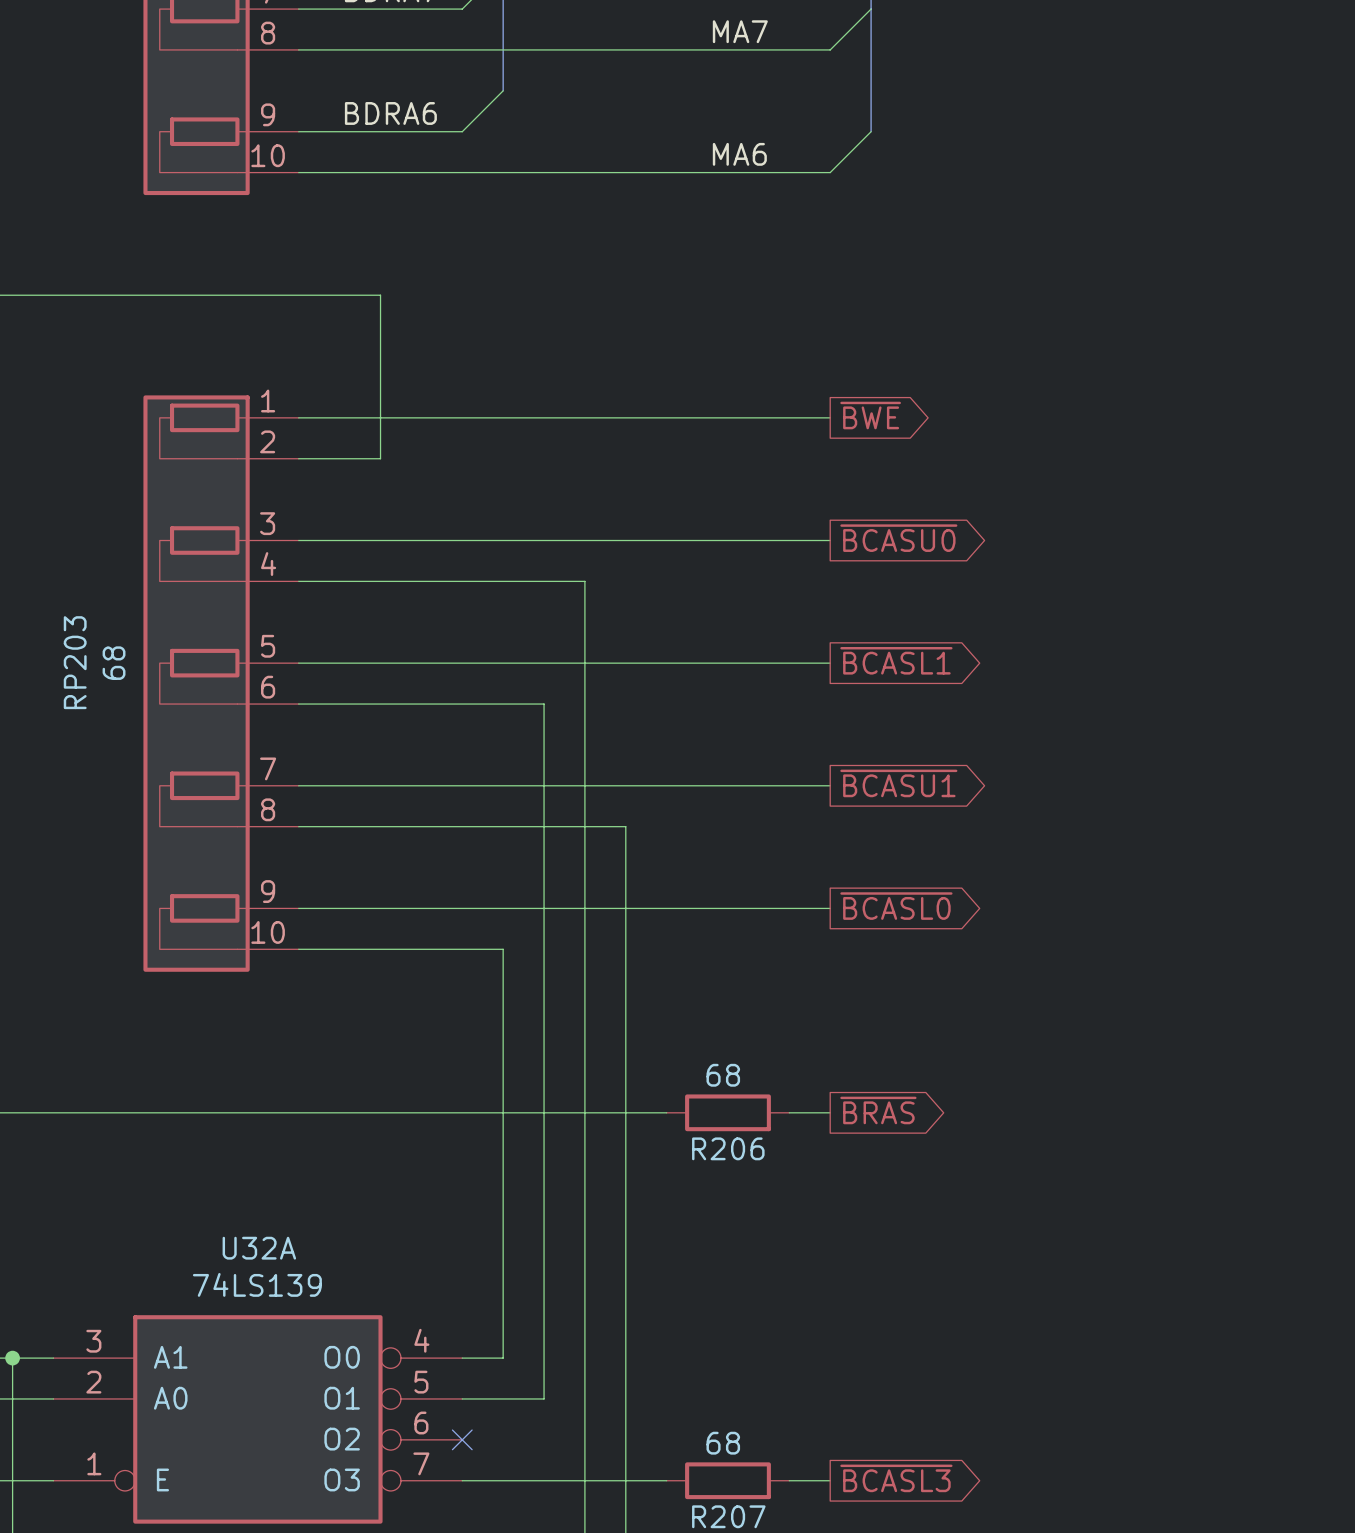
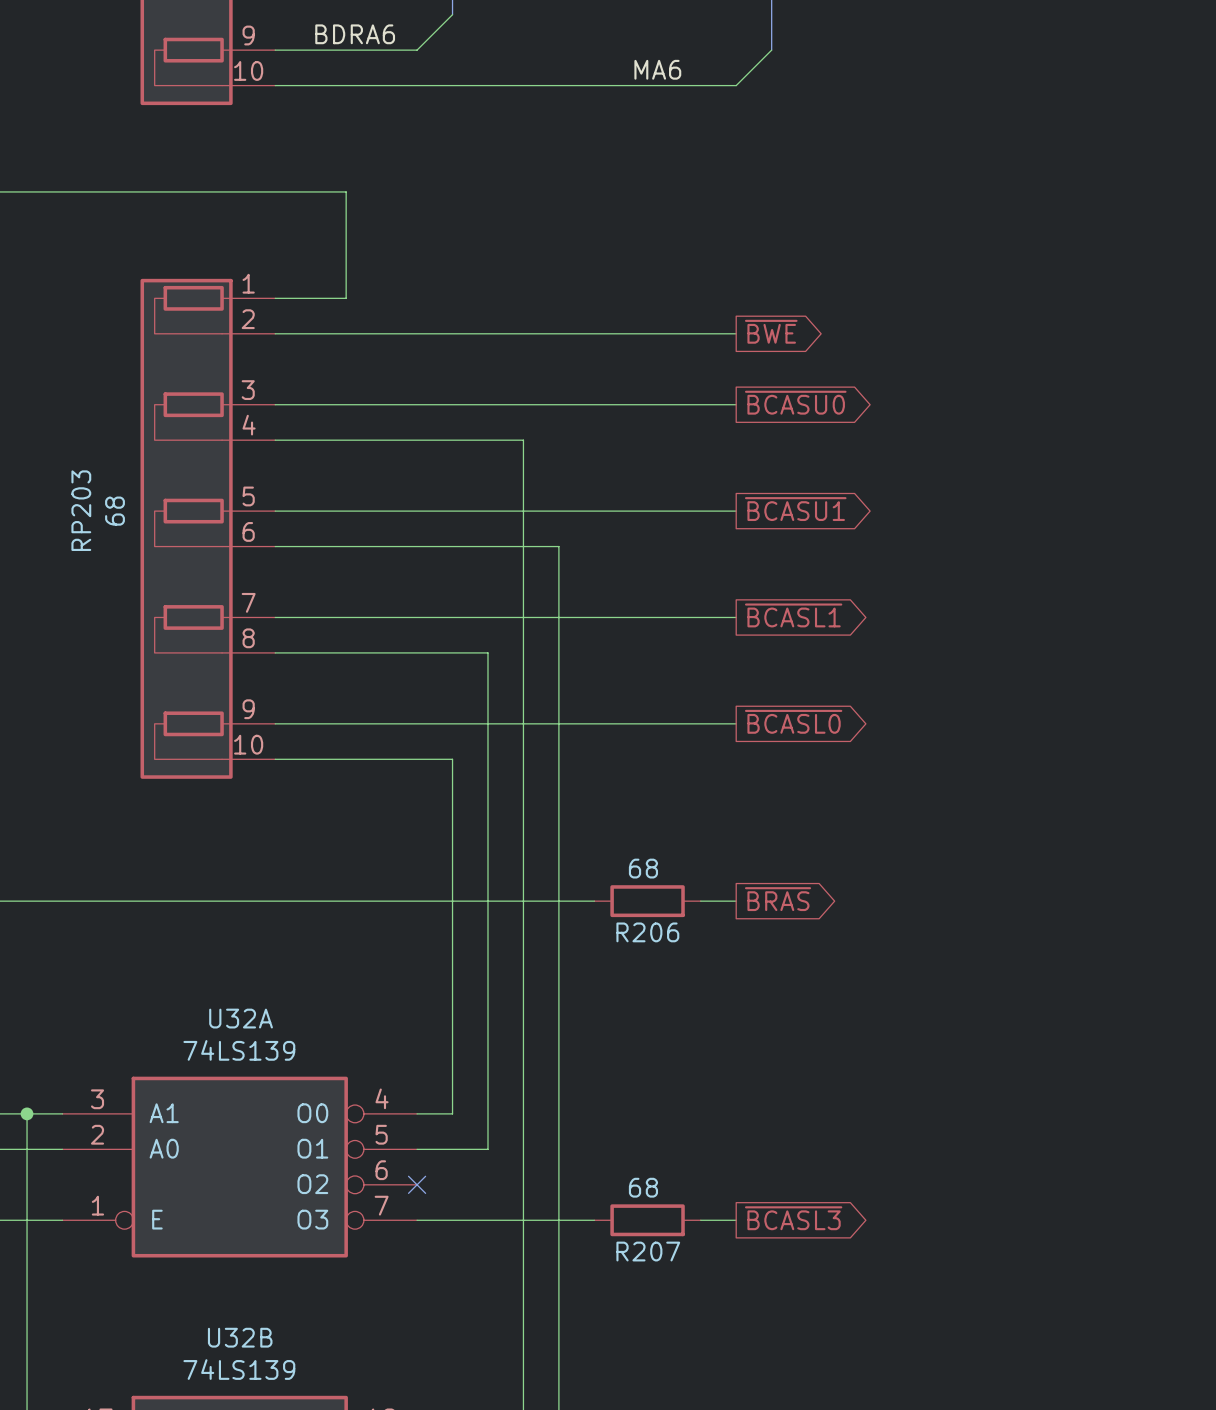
global label position: ~{BWE} (870, 415) -> ~{BWE} (771, 331)
wire: (830, 417) (380, 417) (380, 458) -> (736, 333) (346, 333)
global label: ~{BCASL1} (896, 660) -> ~{BCASU1} (795, 509)
wire: (544, 704) (544, 826) (625, 826) -> (487, 546) (558, 546) (558, 652)
global label: ~{BCASU1} (898, 783) -> ~{BCASL1} (793, 615)

